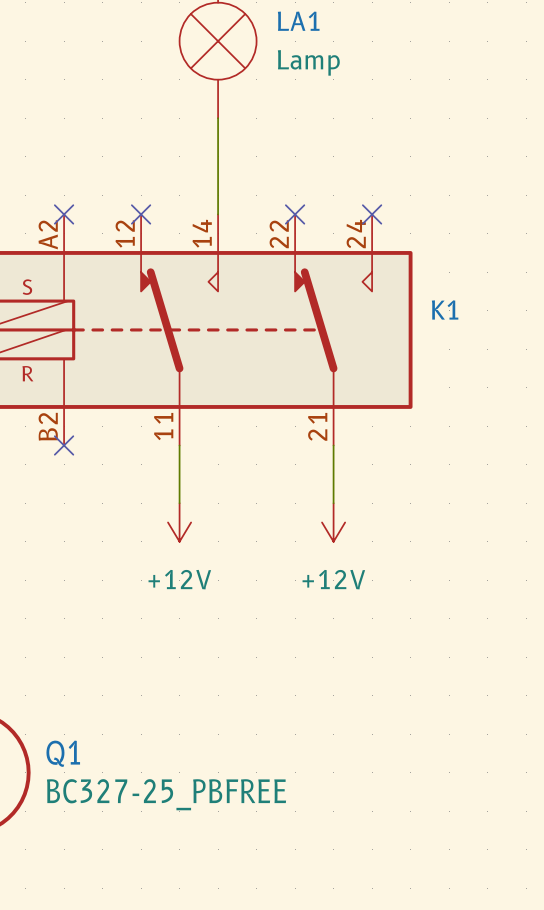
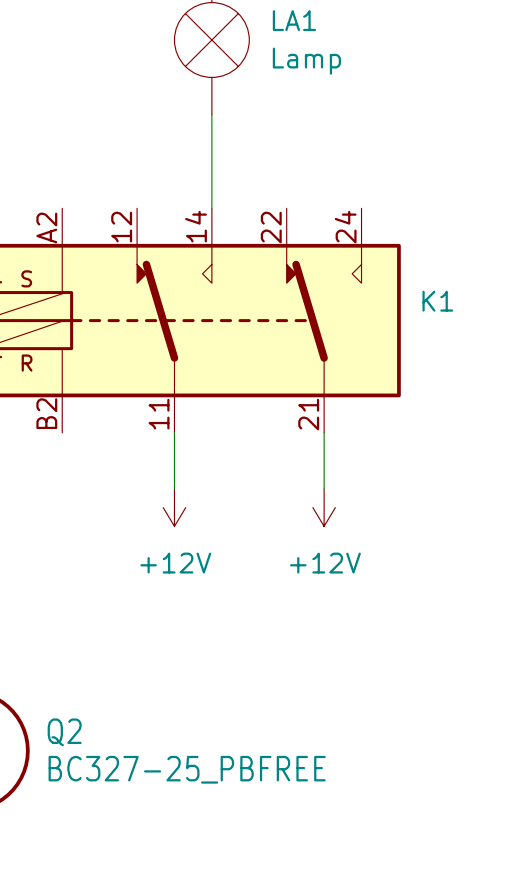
no-connect mark: (64, 214) -> none
no-connect mark: (141, 214) -> none
no-connect mark: (295, 214) -> none
no-connect mark: (372, 214) -> none
no-connect mark: (64, 445) -> none
Q1 name: Q1 (63, 753) -> Q2 (64, 732)

